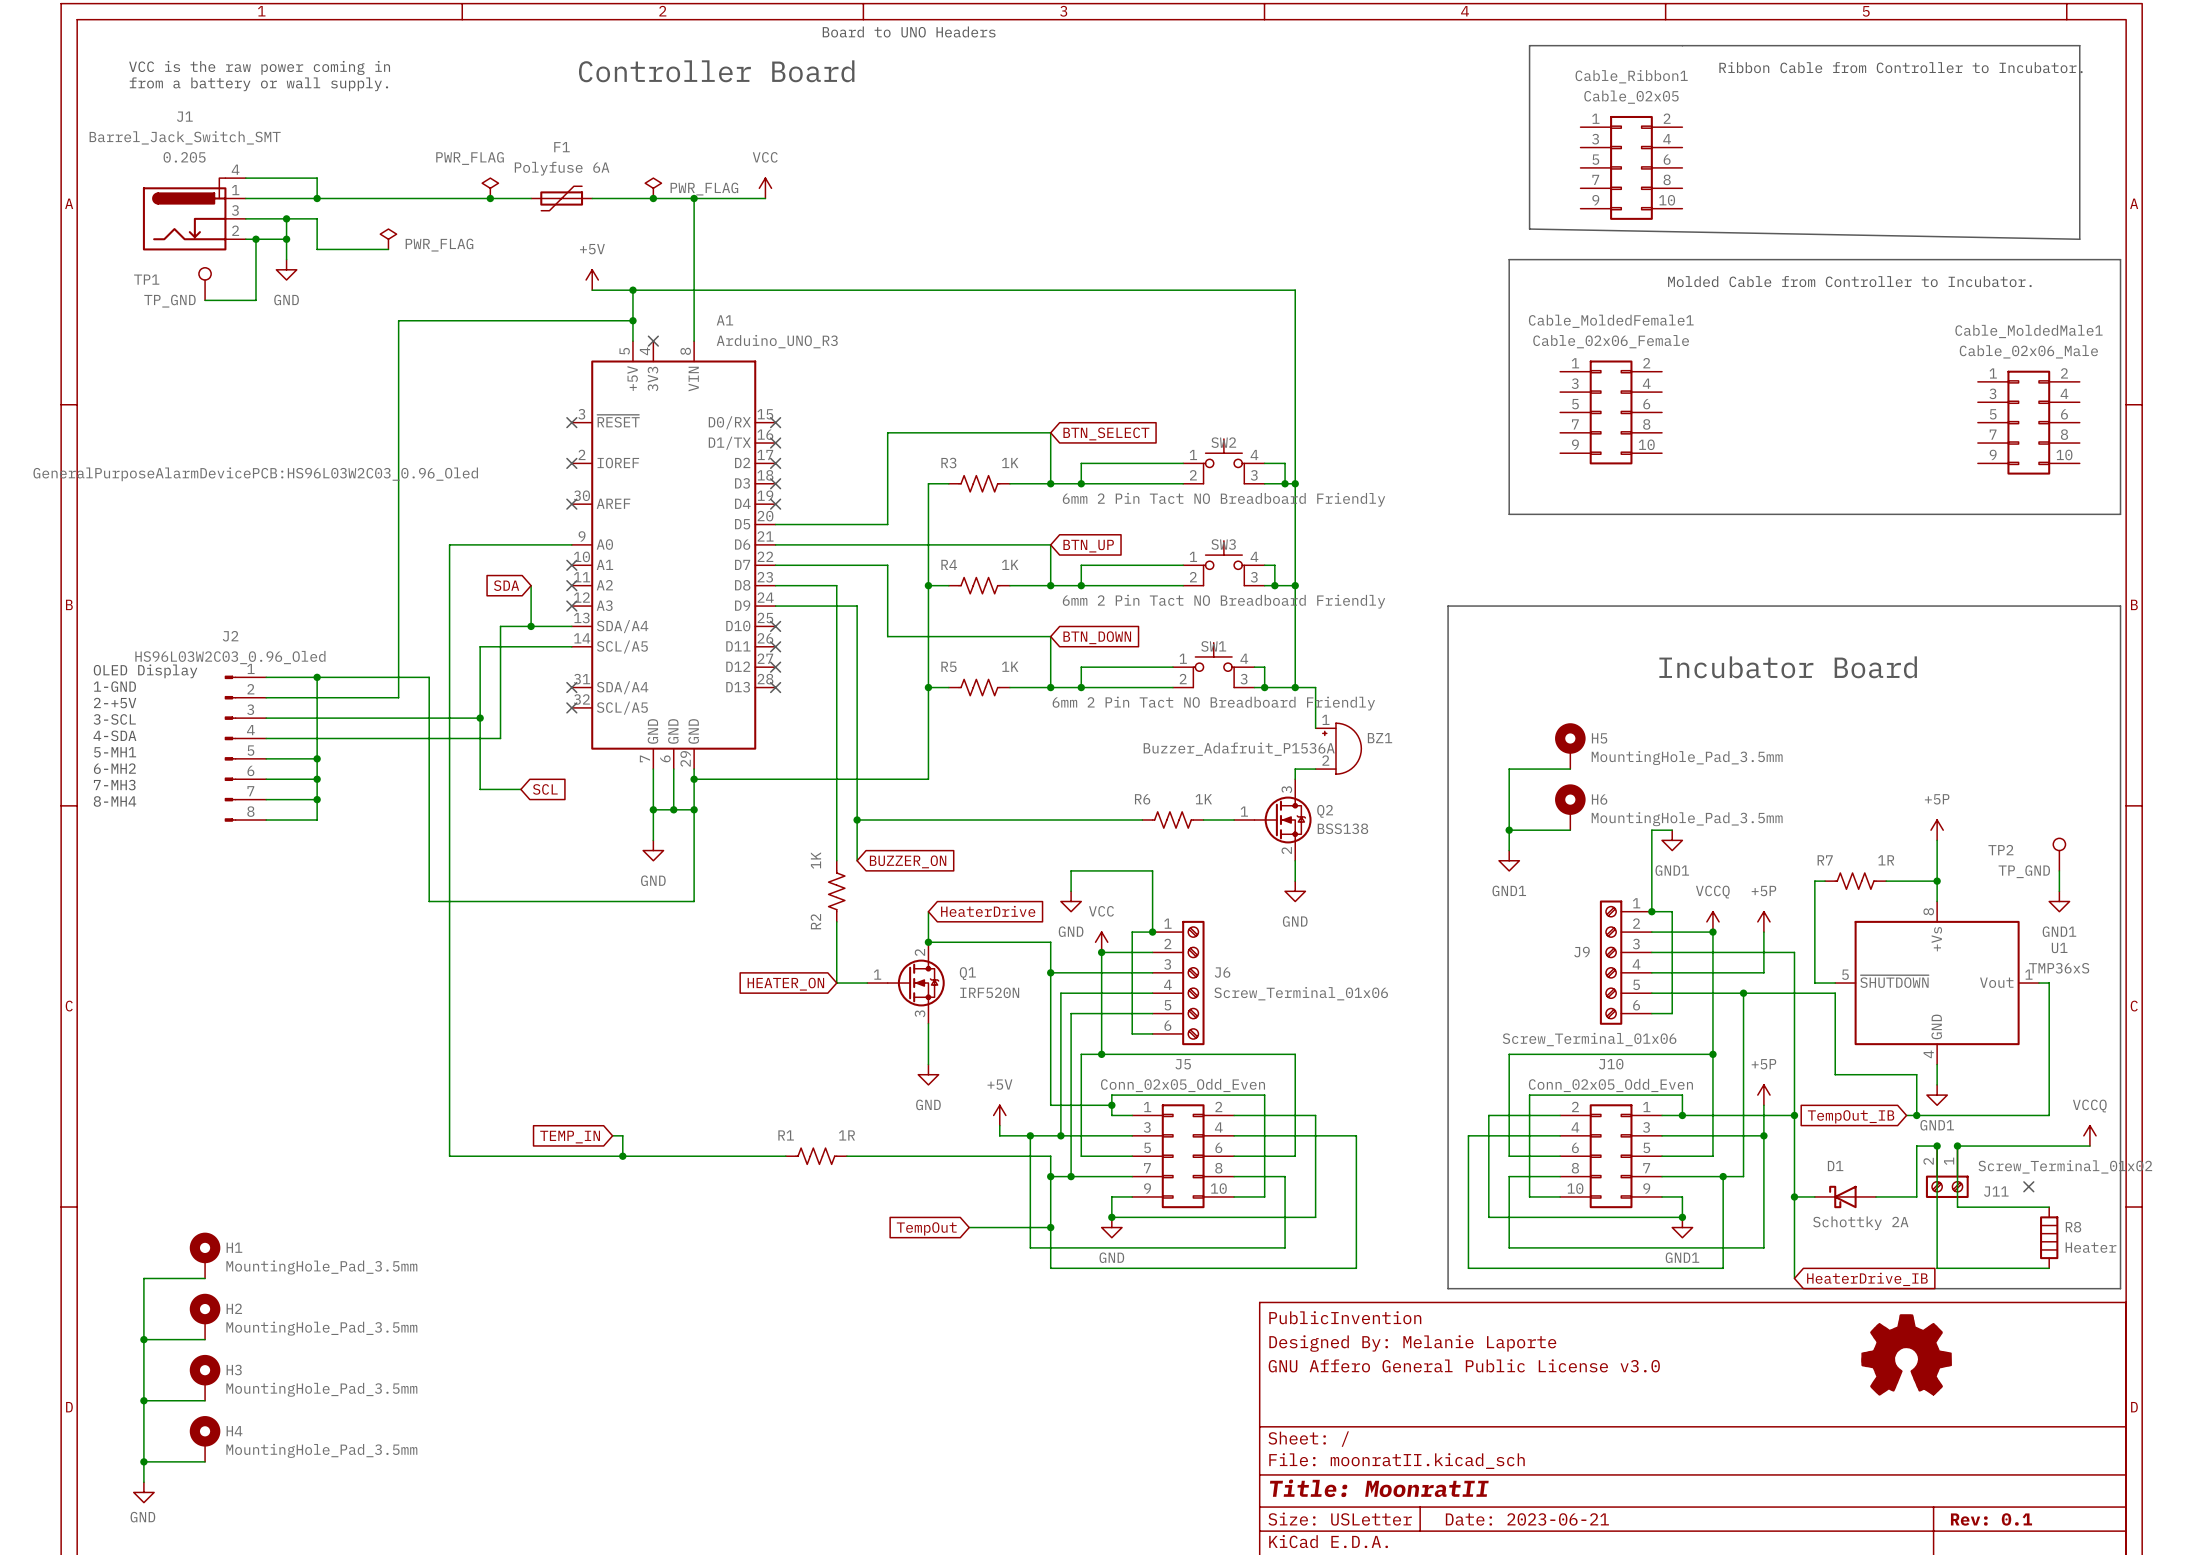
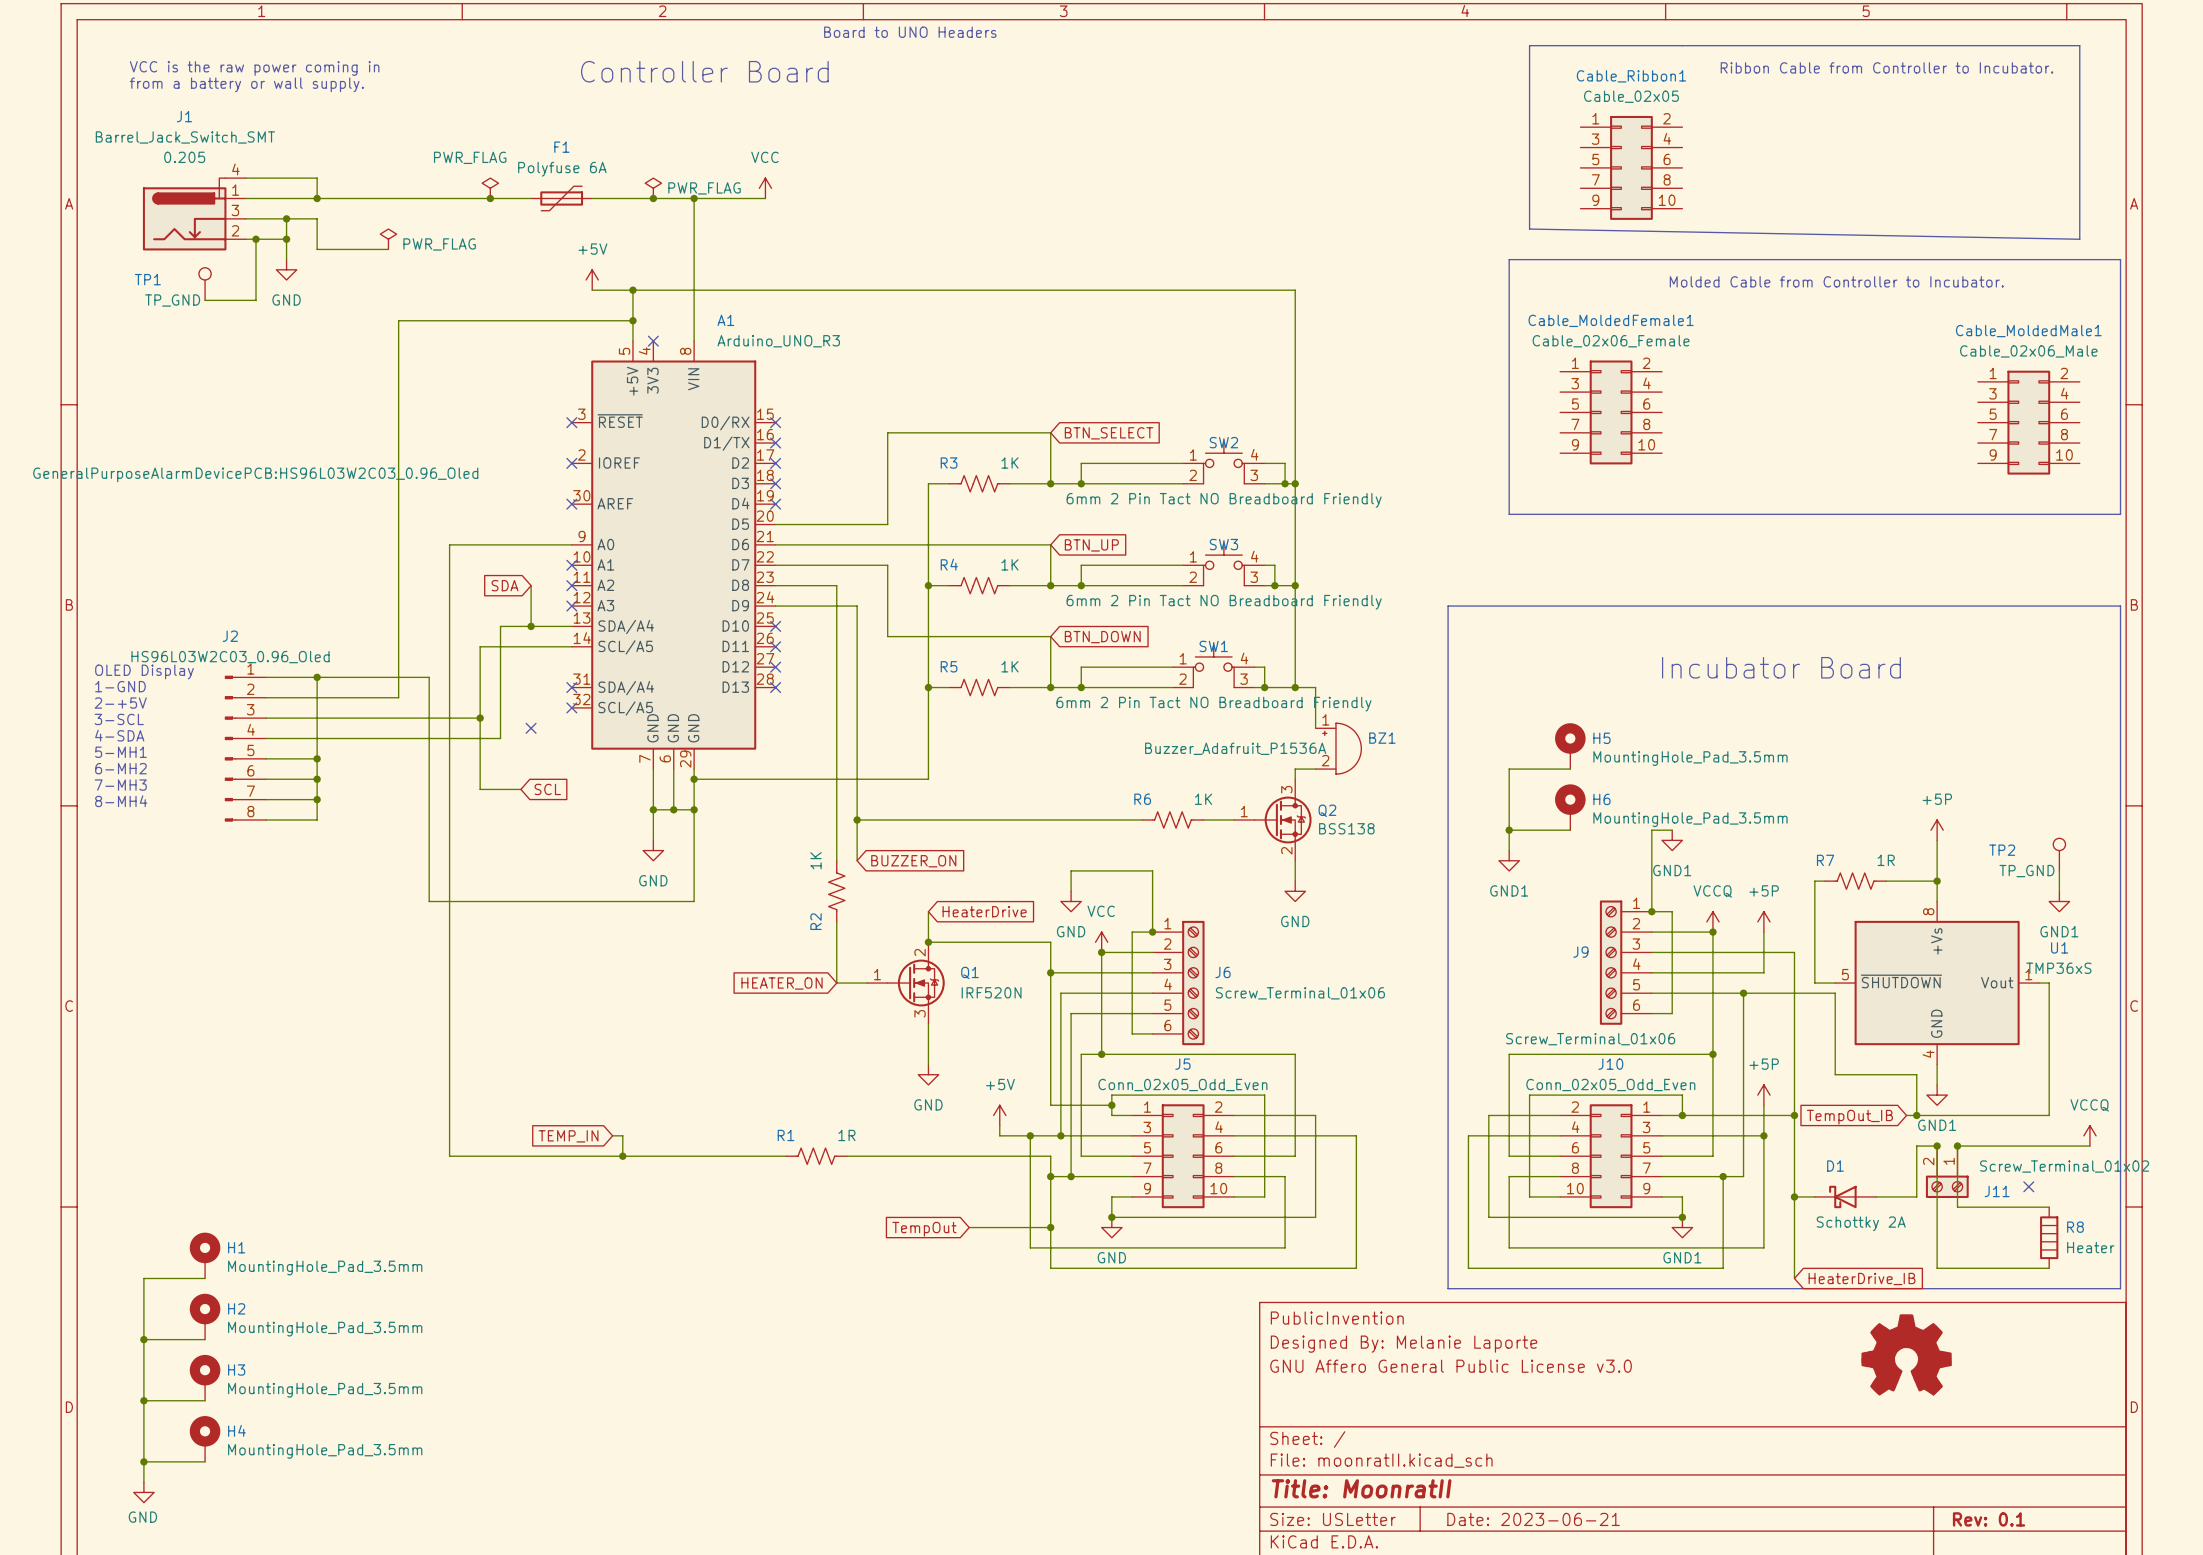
no-connect mark: none -> (531, 728)

